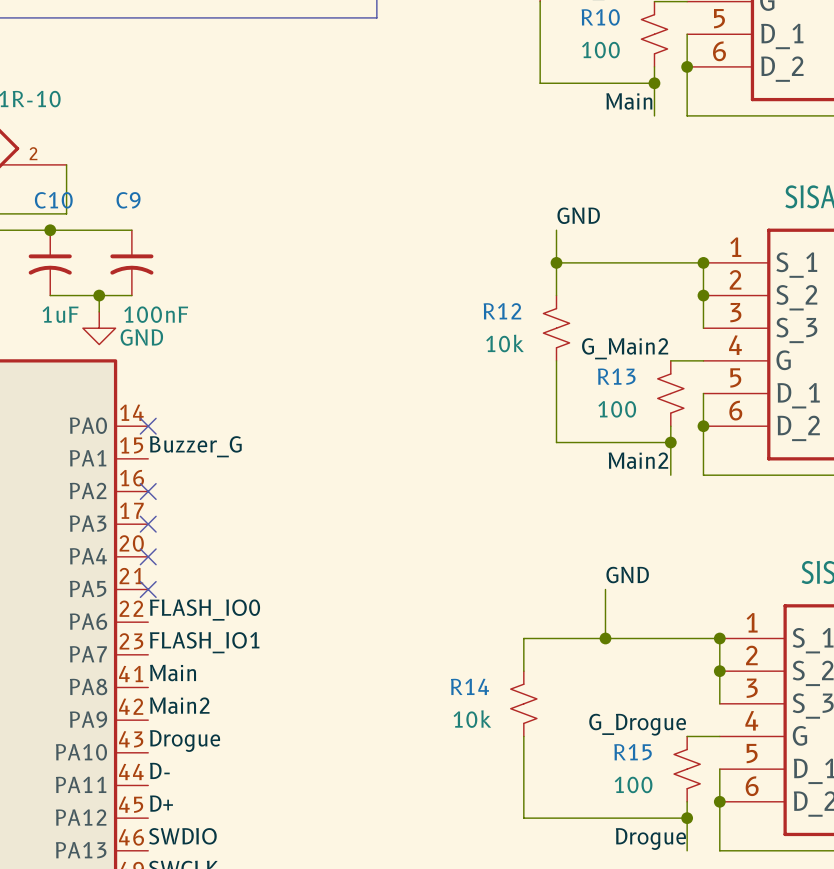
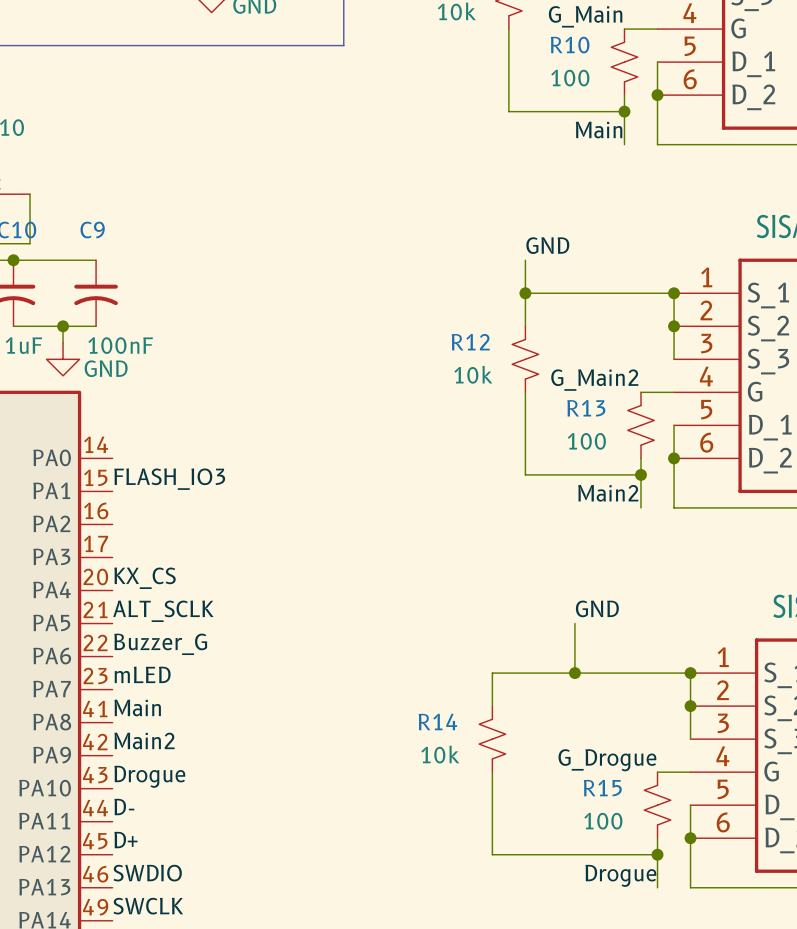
no-connect mark: (148, 426) -> none
label: Buzzer_G (195, 446) -> FLASH_IO3 (169, 479)
no-connect mark: (148, 491) -> none
no-connect mark: (148, 524) -> none
label: none -> KX_CS (145, 578)
no-connect mark: (148, 556) -> none
label: none -> ALT_SCLK (163, 611)
no-connect mark: (148, 589) -> none
label: FLASH_IO0 (205, 610) -> Buzzer_G (160, 644)
label: FLASH_IO1 (204, 642) -> mLED (142, 674)

